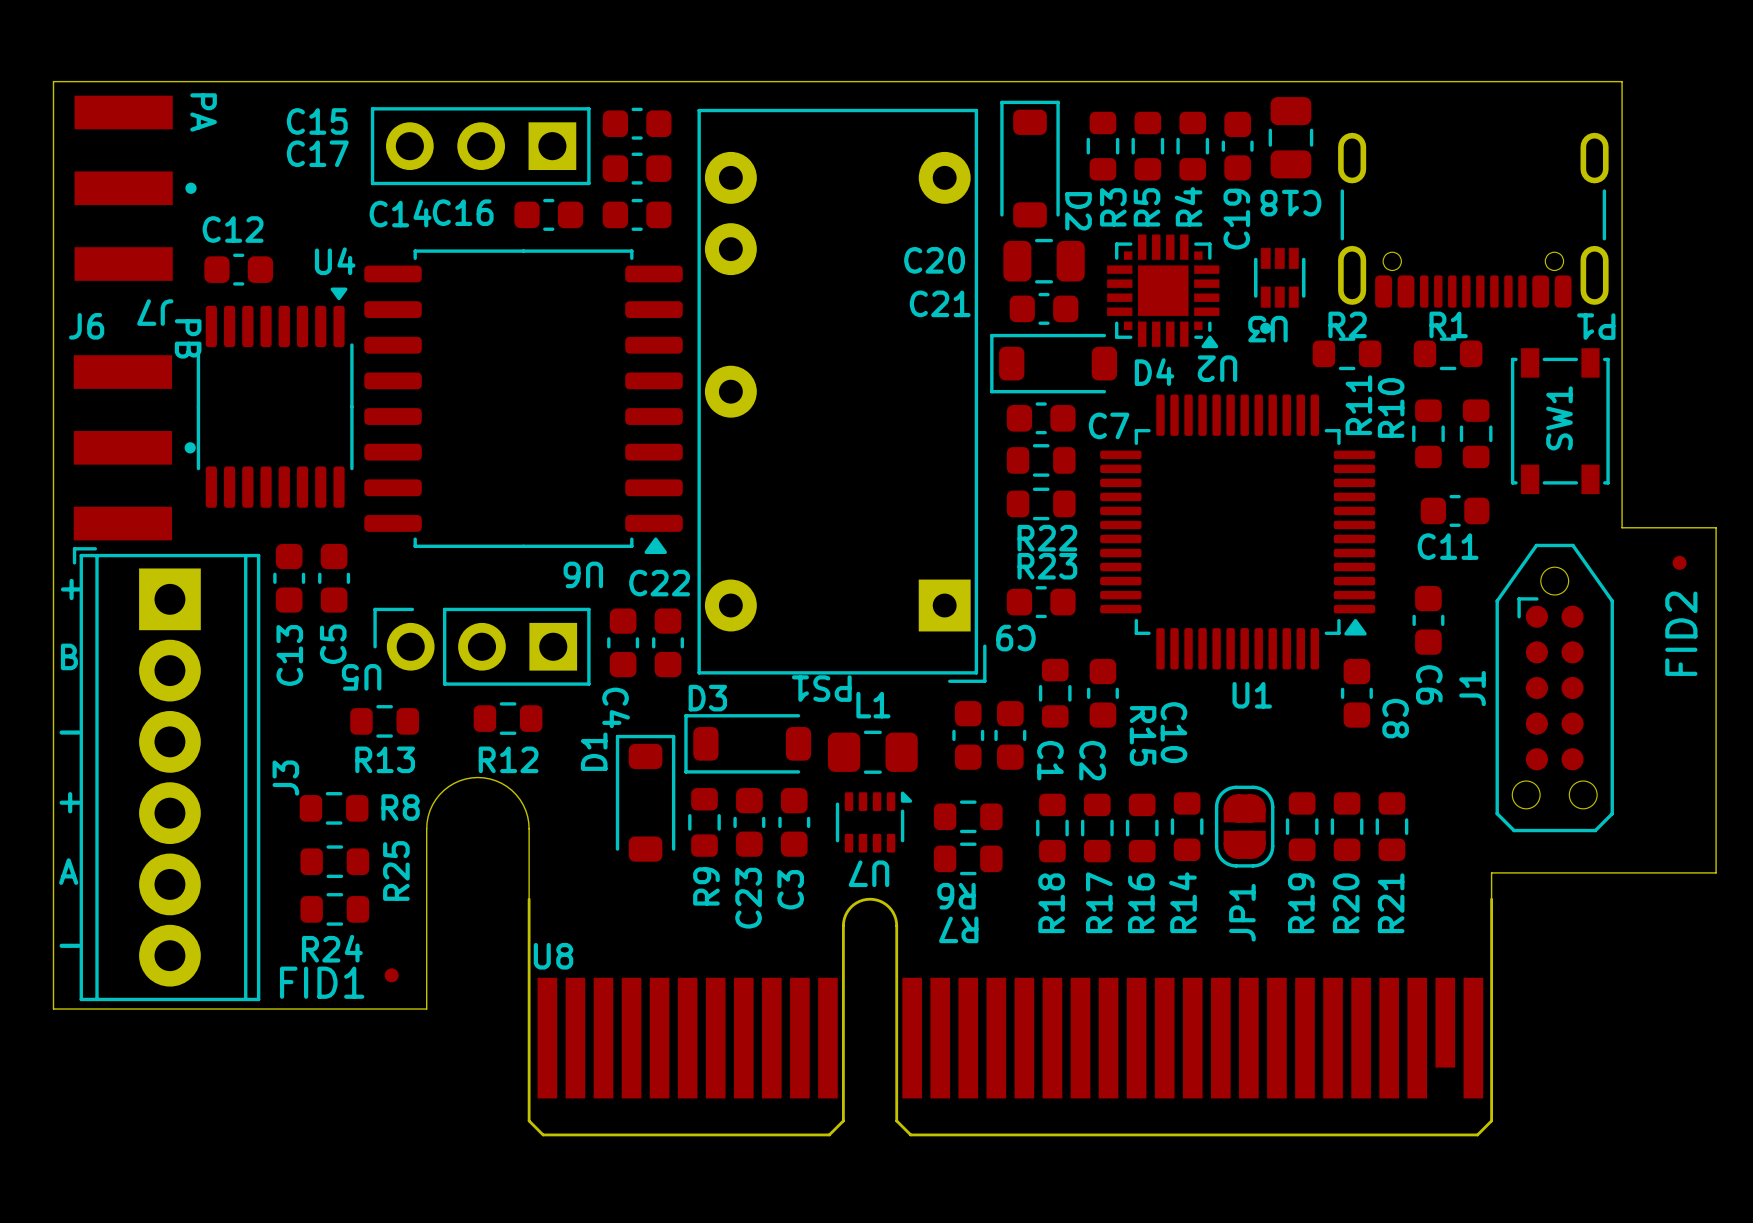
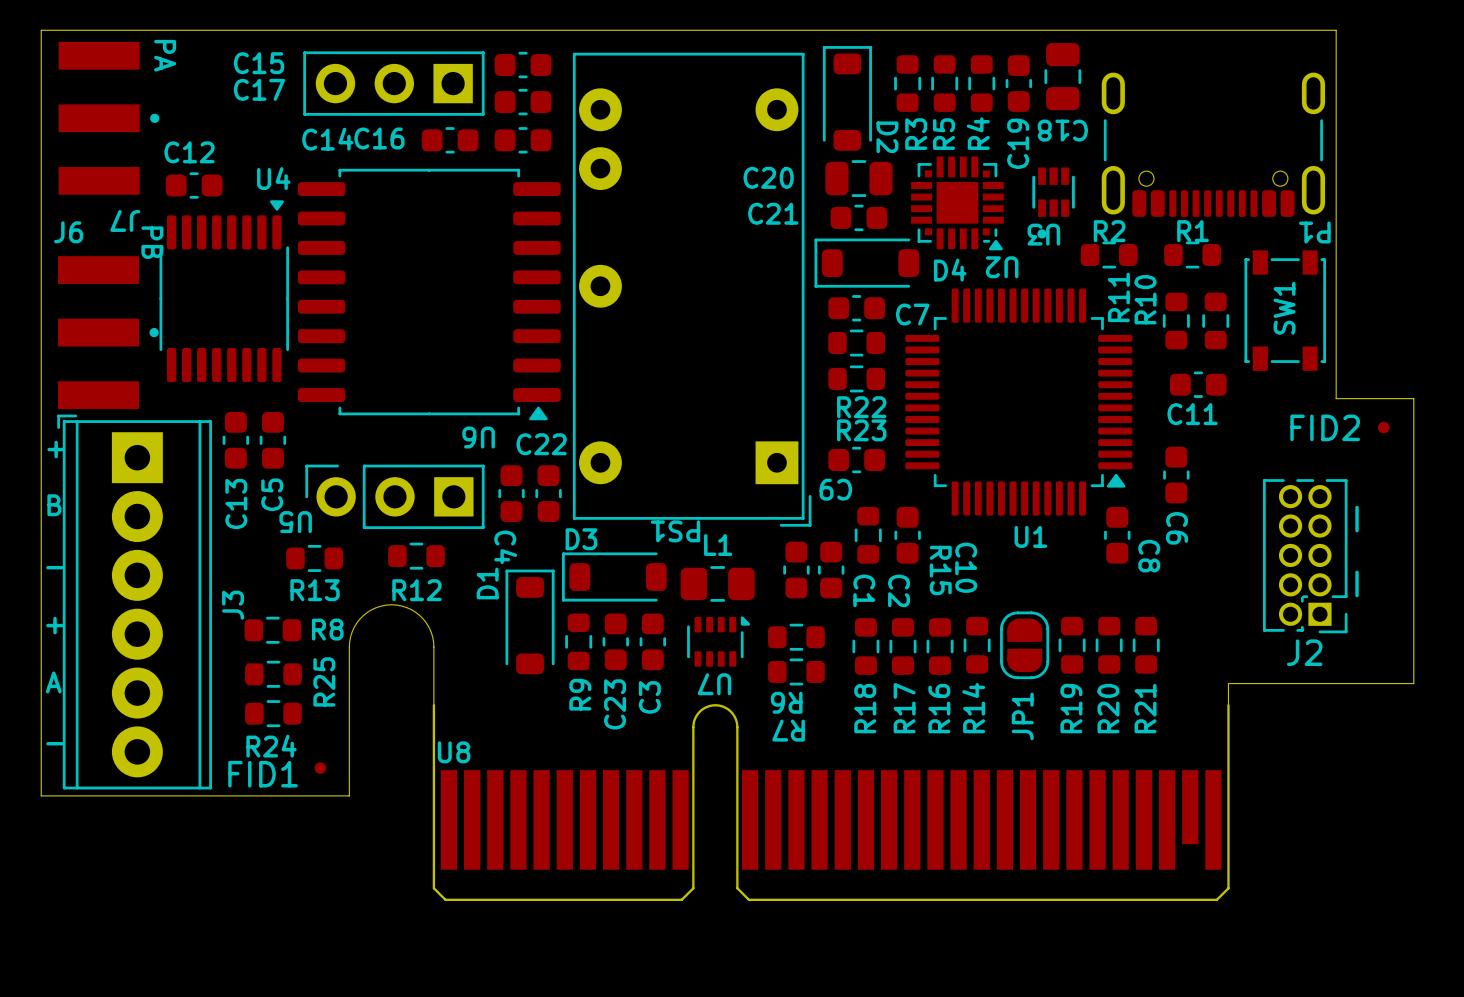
FID2 name rotation: 0° (1681, 633) -> 90° clockwise (1325, 427)
line: none -> (1357, 507) (1357, 530)
J1: (1554, 688) -> none
J2: none -> (1305, 556)
line: none -> (1357, 572) (1357, 595)

